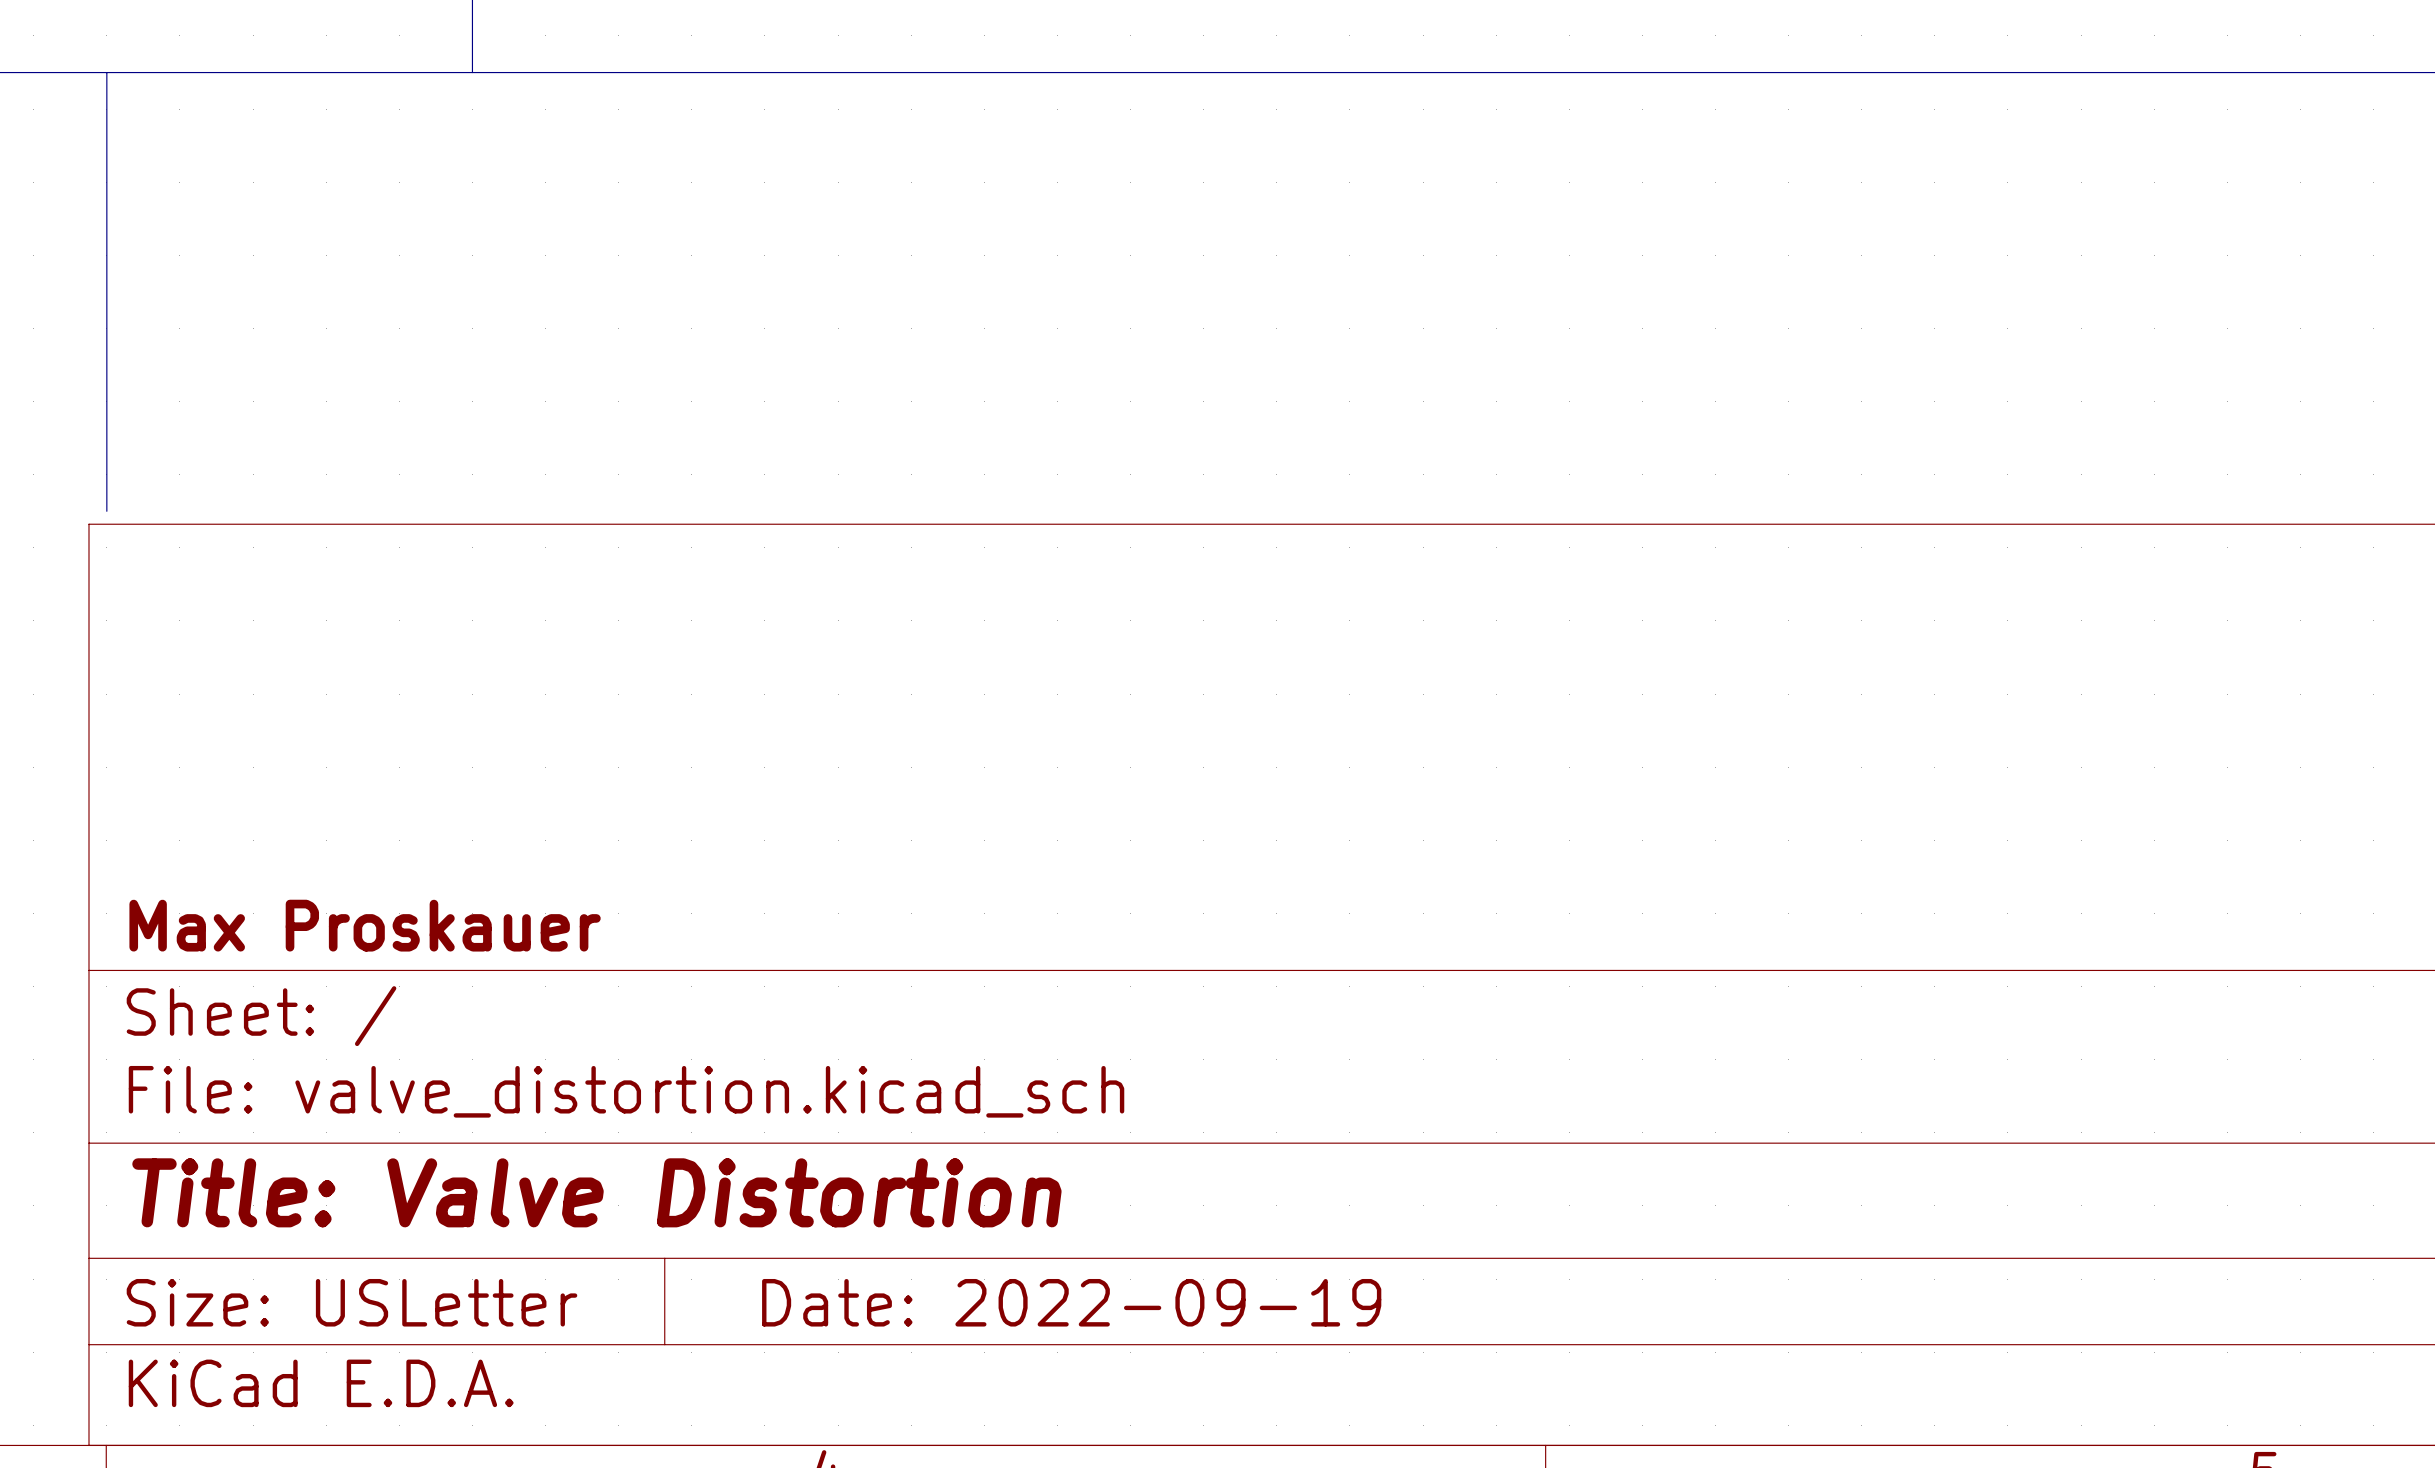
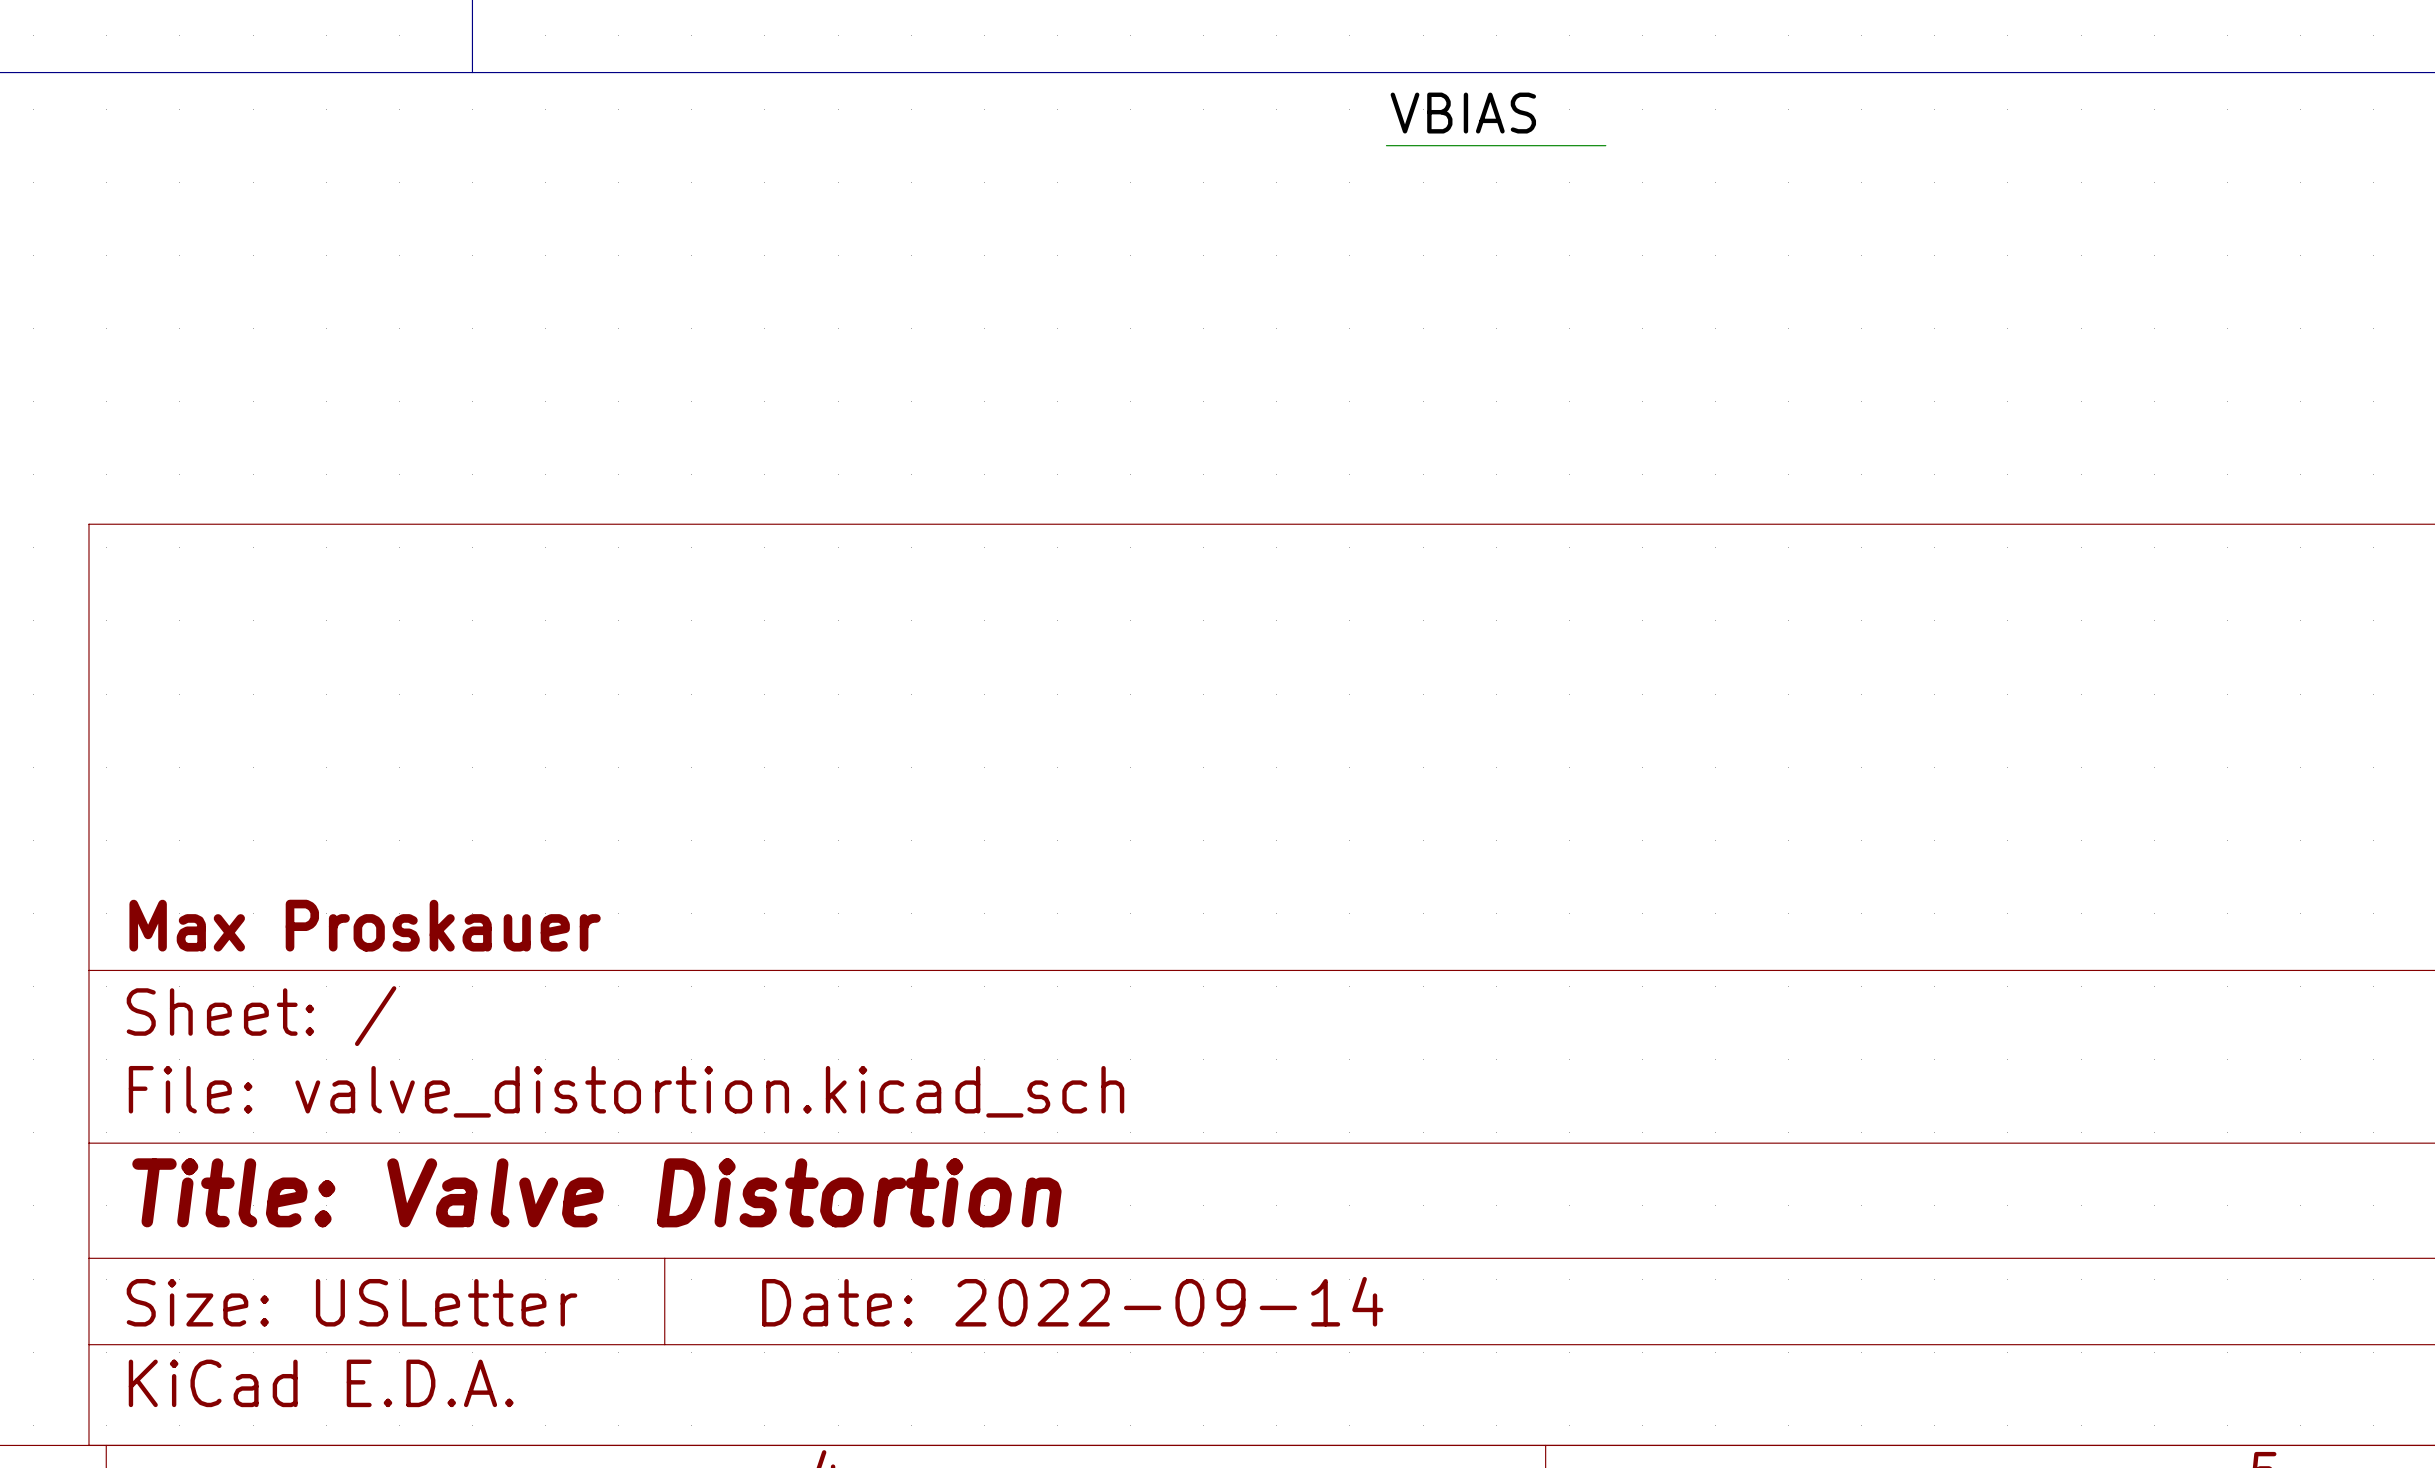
line: (106, 72) (106, 511) -> none
label: none -> VBIAS (1463, 113)
wire: none -> (1386, 145) (1605, 145)
title block: Date: 2022-09-19 (1071, 1302) -> Date: 2022-09-14 (1072, 1301)

